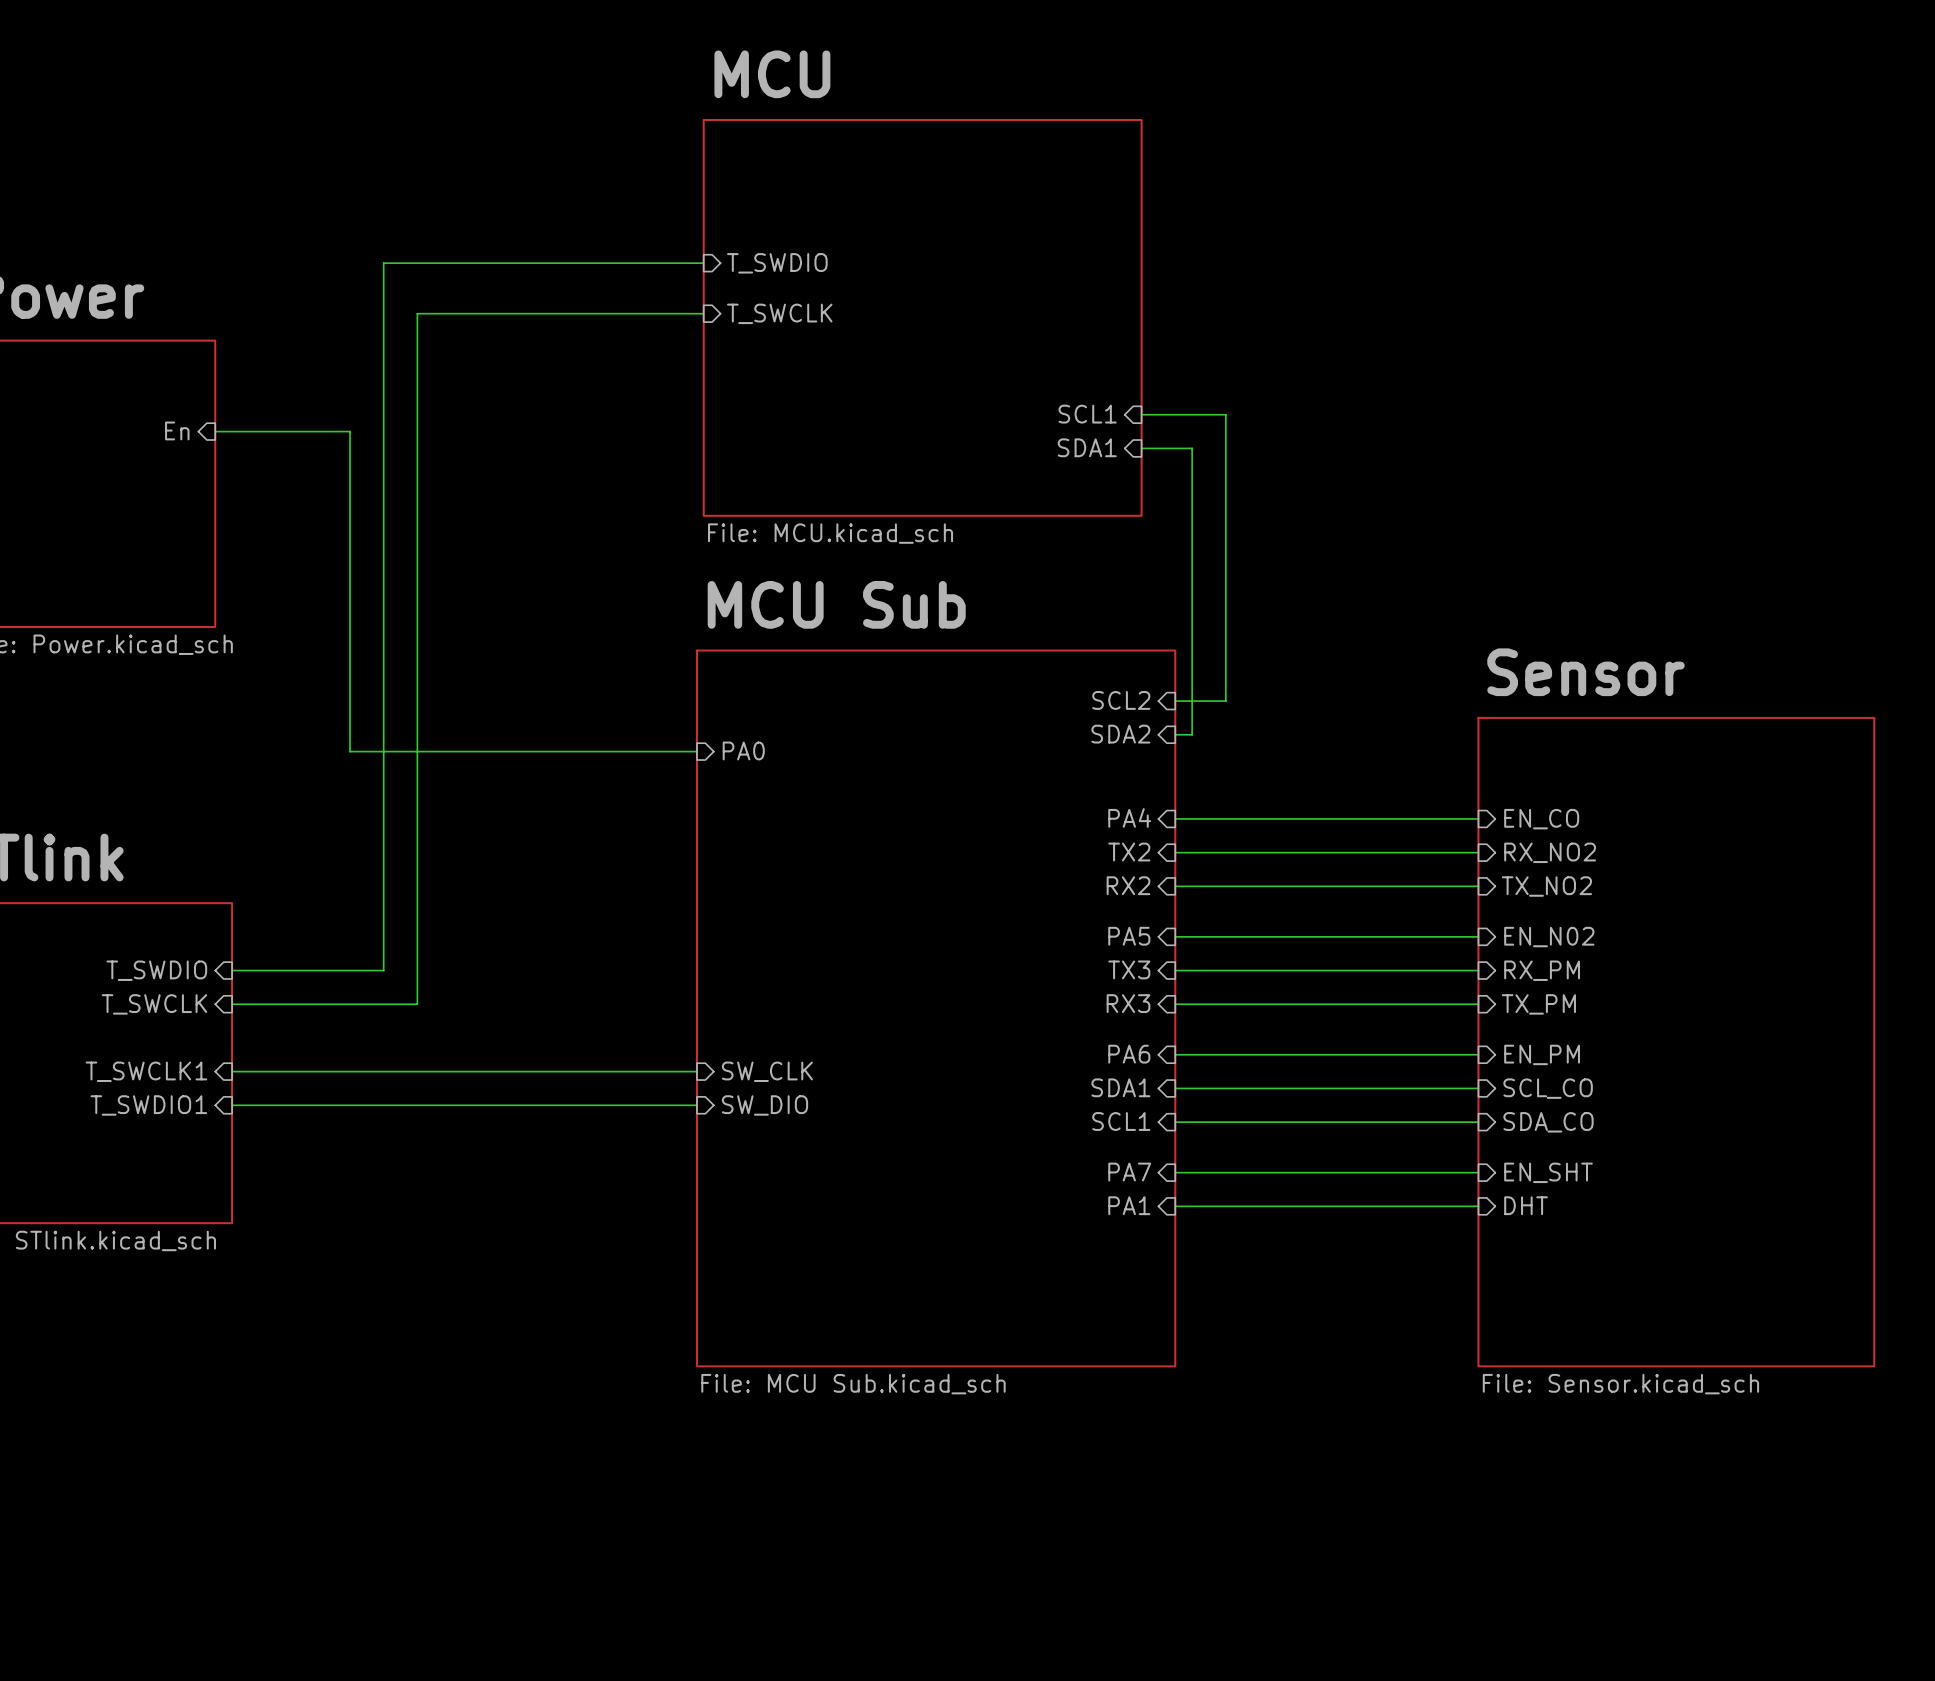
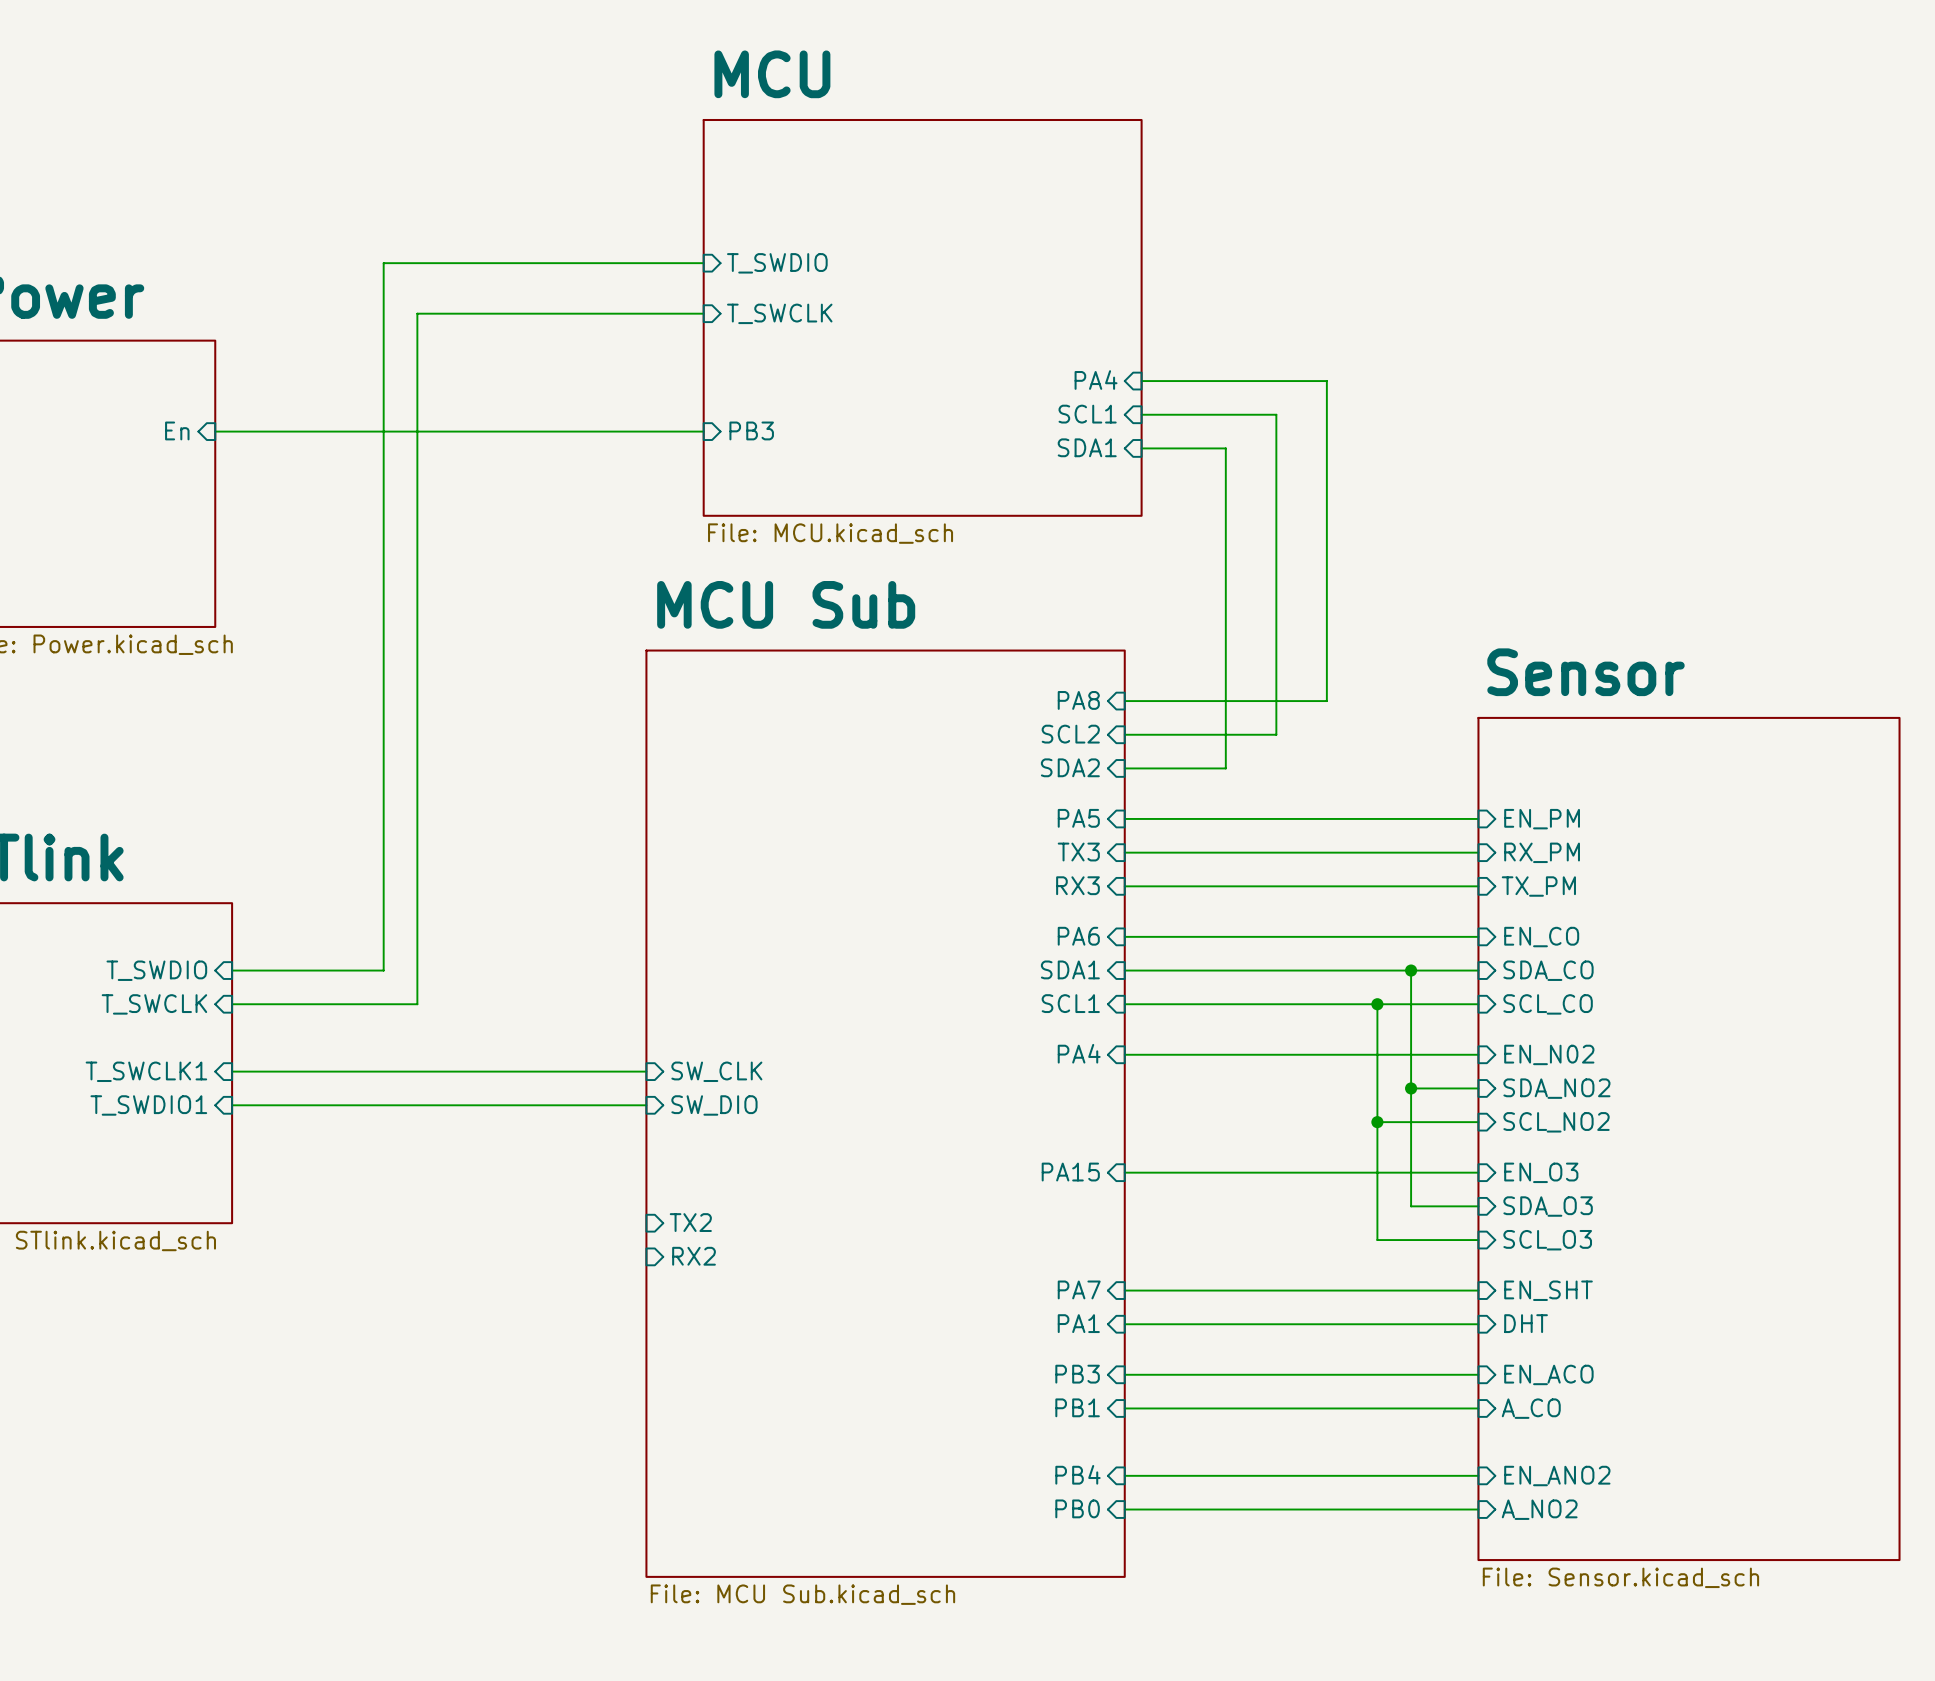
sheet pin: none -> PA4 (1096, 380)
wire: none -> (1141, 381) (1326, 381) (1326, 701) (1225, 701) (1225, 768) (1124, 768)
wire: (1225, 414) (1225, 448) -> (1192, 448) (1225, 448)
sheet pin: none -> PB3 (751, 430)
wire: (350, 431) (350, 751) (696, 751) -> (350, 431) (703, 431)
wire: (1192, 448) (1192, 734) -> (1225, 414) (1276, 414) (1276, 734) (1192, 734)
sheet pin: none -> PA8 (1078, 700)
sheet pin position: SCL2 (1121, 700) -> SCL2 (1070, 734)
wire: none -> (1124, 701) (1175, 701)
sheet pin position: SDA2 (1120, 734) -> SDA2 (1070, 767)
wire: none -> (1124, 734) (1175, 734)
sheet pin: PA0 (743, 750) -> none
sheet pin: PA4 (1129, 817) -> none
wire: none -> (1124, 818) (1175, 818)
sheet pin: EN_CO (1541, 819) -> EN_PM (1542, 819)
wire: none -> (1124, 852) (1175, 852)
sheet pin: TX2 (1129, 852) -> none
sheet pin: RX_NO2 (1550, 852) -> RX_PM (1542, 852)
sheet pin: RX2 (1128, 885) -> none
wire: none -> (1124, 886) (1175, 886)
sheet pin: TX_NO2 (1546, 886) -> TX_PM (1538, 886)
wire: none -> (1124, 936) (1175, 936)
sheet pin position: PA5 (1129, 936) -> PA5 (1078, 818)
sheet pin: EN_N02 (1549, 937) -> EN_CO (1541, 937)
sheet pin position: TX3 (1129, 969) -> TX3 (1078, 852)
wire: none -> (1124, 970) (1175, 970)
junction: none -> (1411, 970)
sheet pin: RX_PM (1542, 970) -> SDA_CO (1548, 970)
sheet pin position: RX3 (1128, 1003) -> RX3 (1077, 885)
wire: none -> (1124, 1004) (1175, 1004)
wire: none -> (1377, 1004) (1377, 1240) (1478, 1240)
junction: none -> (1377, 1004)
sheet pin: TX_PM (1538, 1004) -> SCL_CO (1548, 1004)
sheet MCU Sub: File: MCU Sub.kicad_sch (936, 1008) -> none
sheet Sensor: File: Sensor.kicad_sch (1676, 1042) -> none
sheet pin: none -> PA4 (1079, 1053)
wire: none -> (1124, 1054) (1175, 1054)
sheet pin position: PA6 (1129, 1054) -> PA6 (1078, 936)
sheet pin: EN_PM (1542, 1054) -> EN_N02 (1549, 1054)
wire: (646, 1071) (696, 1071) -> none
sheet pin position: SW_CLK (767, 1071) -> SW_CLK (716, 1071)
sheet pin position: SDA1 (1120, 1087) -> SDA1 (1070, 969)
wire: (1175, 1088) (1411, 1088) -> none
junction: none -> (1411, 1088)
sheet pin: SCL_CO (1548, 1088) -> SDA_NO2 (1556, 1088)
wire: (646, 1105) (696, 1105) -> none
sheet pin position: SW_DIO (764, 1105) -> SW_DIO (714, 1105)
sheet MCU Sub: none -> File: MCU Sub.kicad_sch (885, 1113)
sheet pin position: SCL1 (1121, 1121) -> SCL1 (1070, 1003)
wire: (1175, 1122) (1377, 1122) -> none
junction: none -> (1377, 1122)
sheet pin: SDA_CO (1548, 1122) -> SCL_NO2 (1556, 1122)
sheet Sensor: none -> File: Sensor.kicad_sch (1688, 1138)
sheet pin: none -> PA15 (1070, 1172)
wire: none -> (1124, 1172) (1175, 1172)
sheet pin position: PA7 (1129, 1172) -> PA7 (1079, 1289)
sheet pin: EN_SHT (1548, 1172) -> EN_O3 (1541, 1172)
sheet pin position: PA1 (1129, 1205) -> PA1 (1078, 1323)
sheet pin: DHT (1526, 1205) -> SDA_O3 (1548, 1206)
wire: (1175, 1206) (1411, 1206) -> (1411, 970) (1411, 1206)
sheet pin: none -> TX2 (690, 1222)
sheet pin: none -> SCL_O3 (1547, 1240)
sheet pin: none -> RX2 (694, 1256)
wire: none -> (1124, 1290) (1478, 1290)
sheet pin: none -> EN_SHT (1548, 1290)
sheet pin: none -> DHT (1526, 1323)
wire: none -> (1124, 1324) (1478, 1324)
sheet pin: none -> PB3 (1077, 1374)
wire: none -> (1124, 1374) (1478, 1374)
sheet pin: none -> EN_ACO (1548, 1374)
sheet pin: none -> PB1 (1077, 1407)
wire: none -> (1124, 1408) (1478, 1408)
sheet pin: none -> A_CO (1531, 1408)
sheet pin: none -> PB4 (1077, 1474)
wire: none -> (1124, 1475) (1478, 1475)
sheet pin: none -> EN_ANO2 (1557, 1476)
sheet pin: none -> PB0 (1077, 1508)
wire: none -> (1124, 1509) (1478, 1509)
sheet pin: none -> A_NO2 (1539, 1509)

